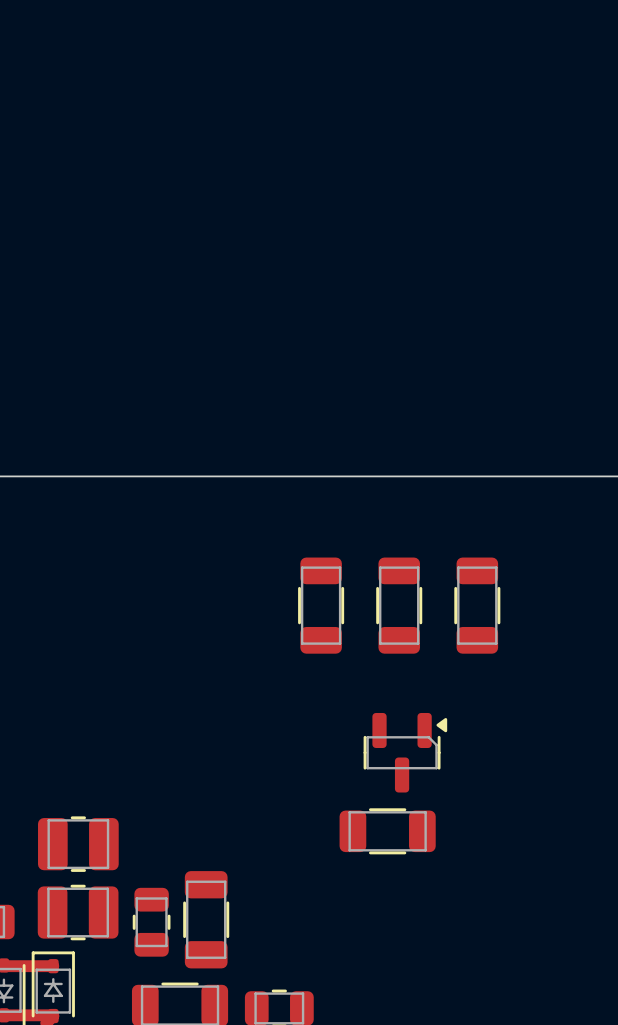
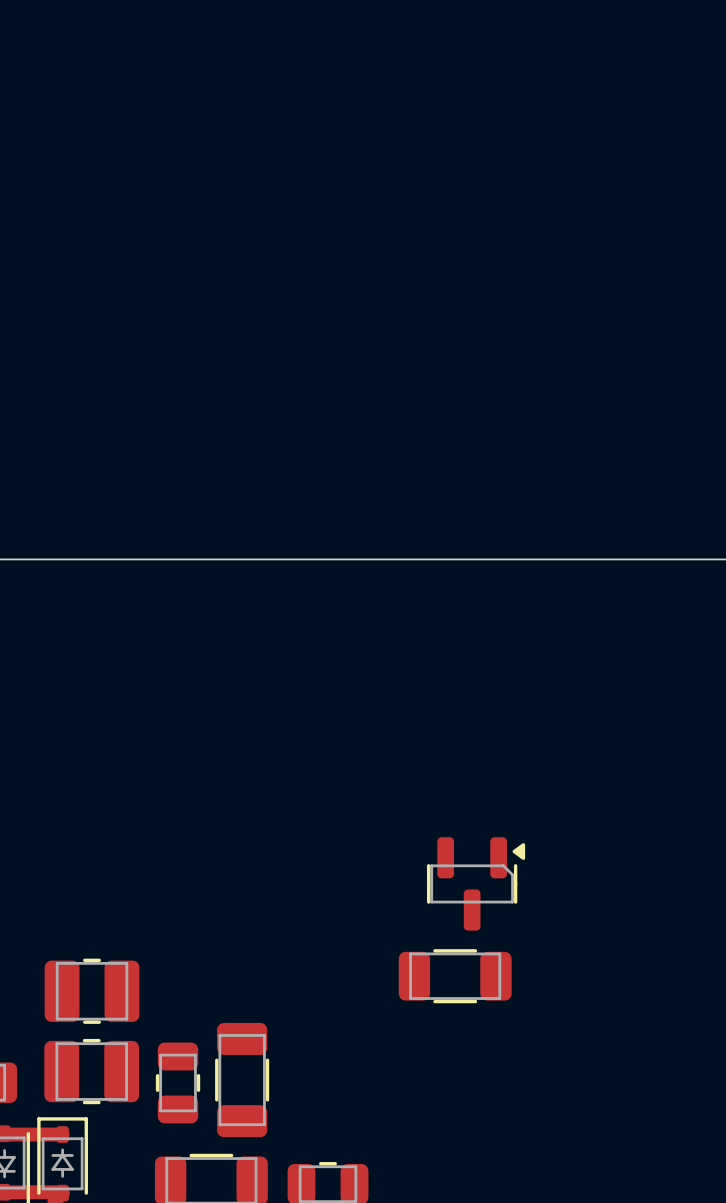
part: (321, 605) -> none
part: (399, 605) -> none
part: (477, 605) -> none

